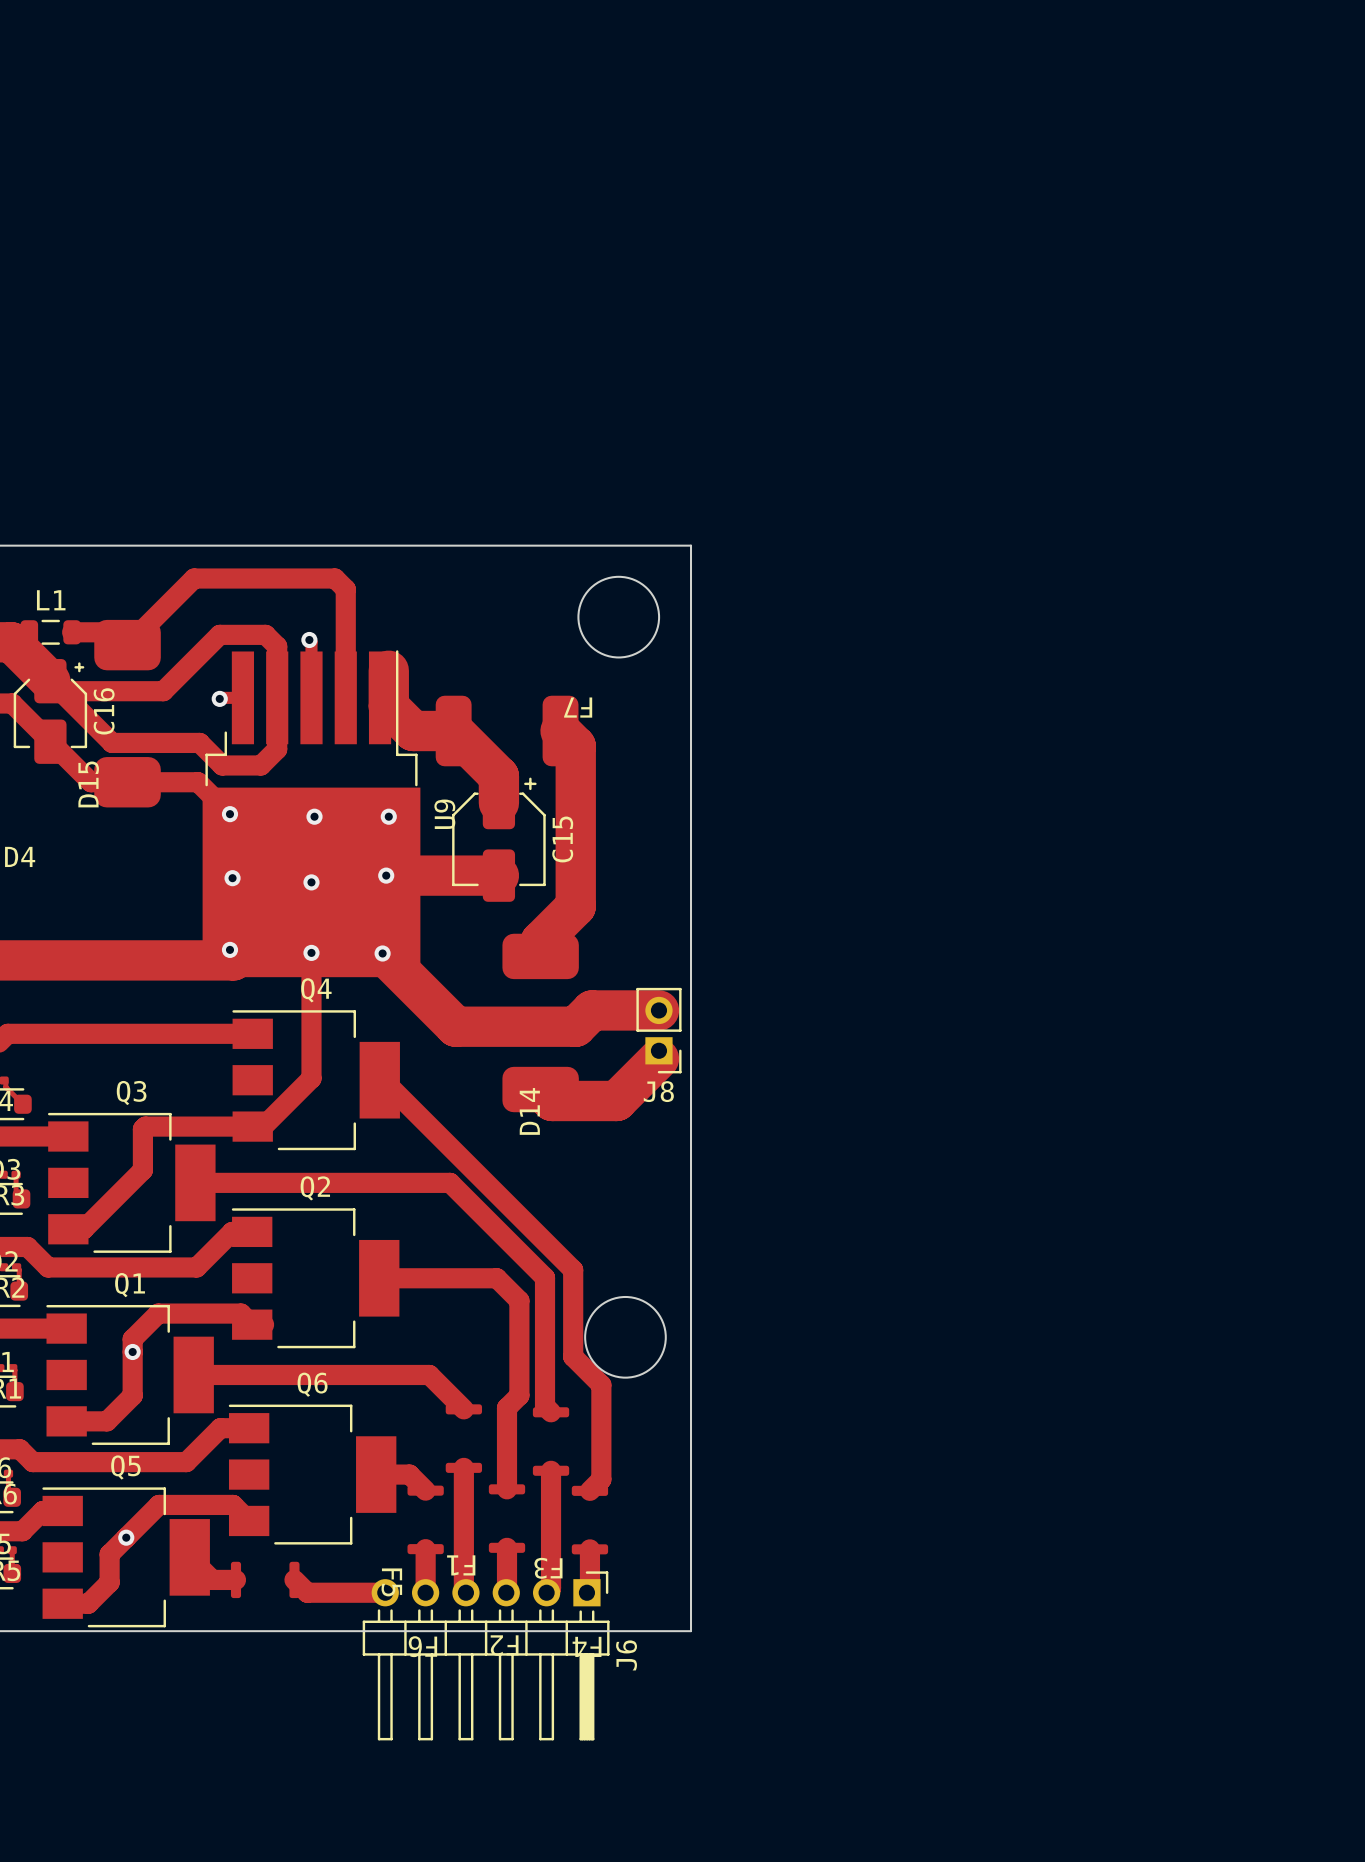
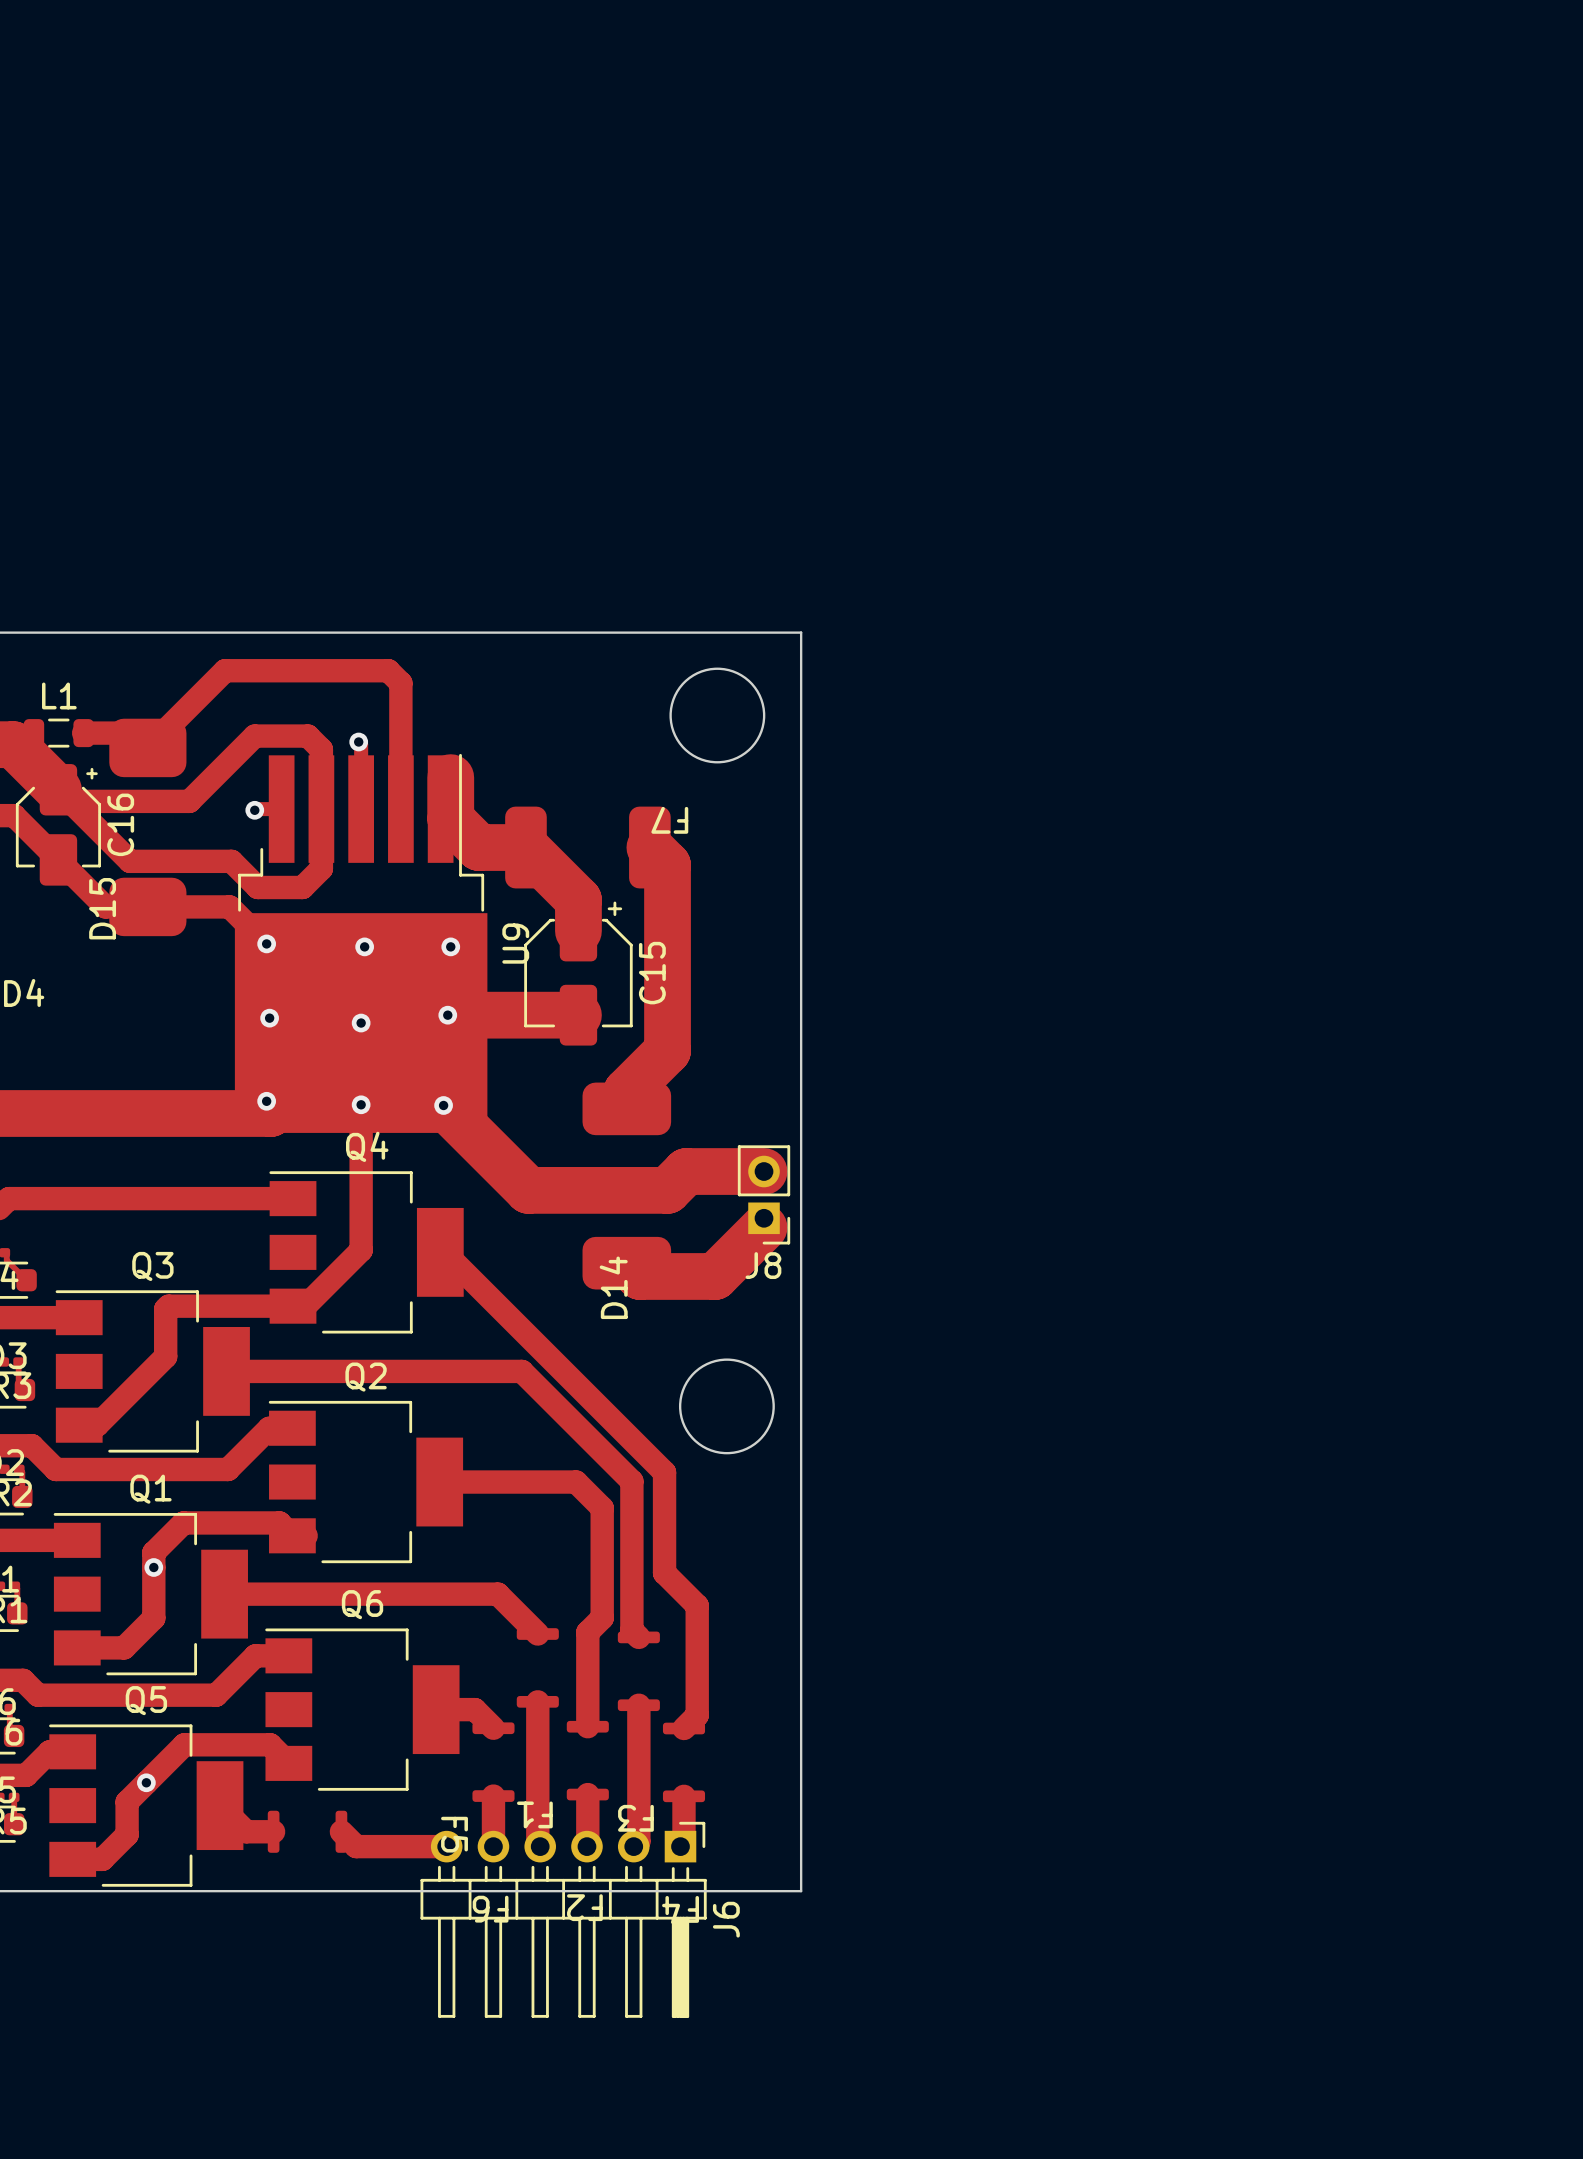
round board edge position: (625, 1337) -> (726, 1406)

